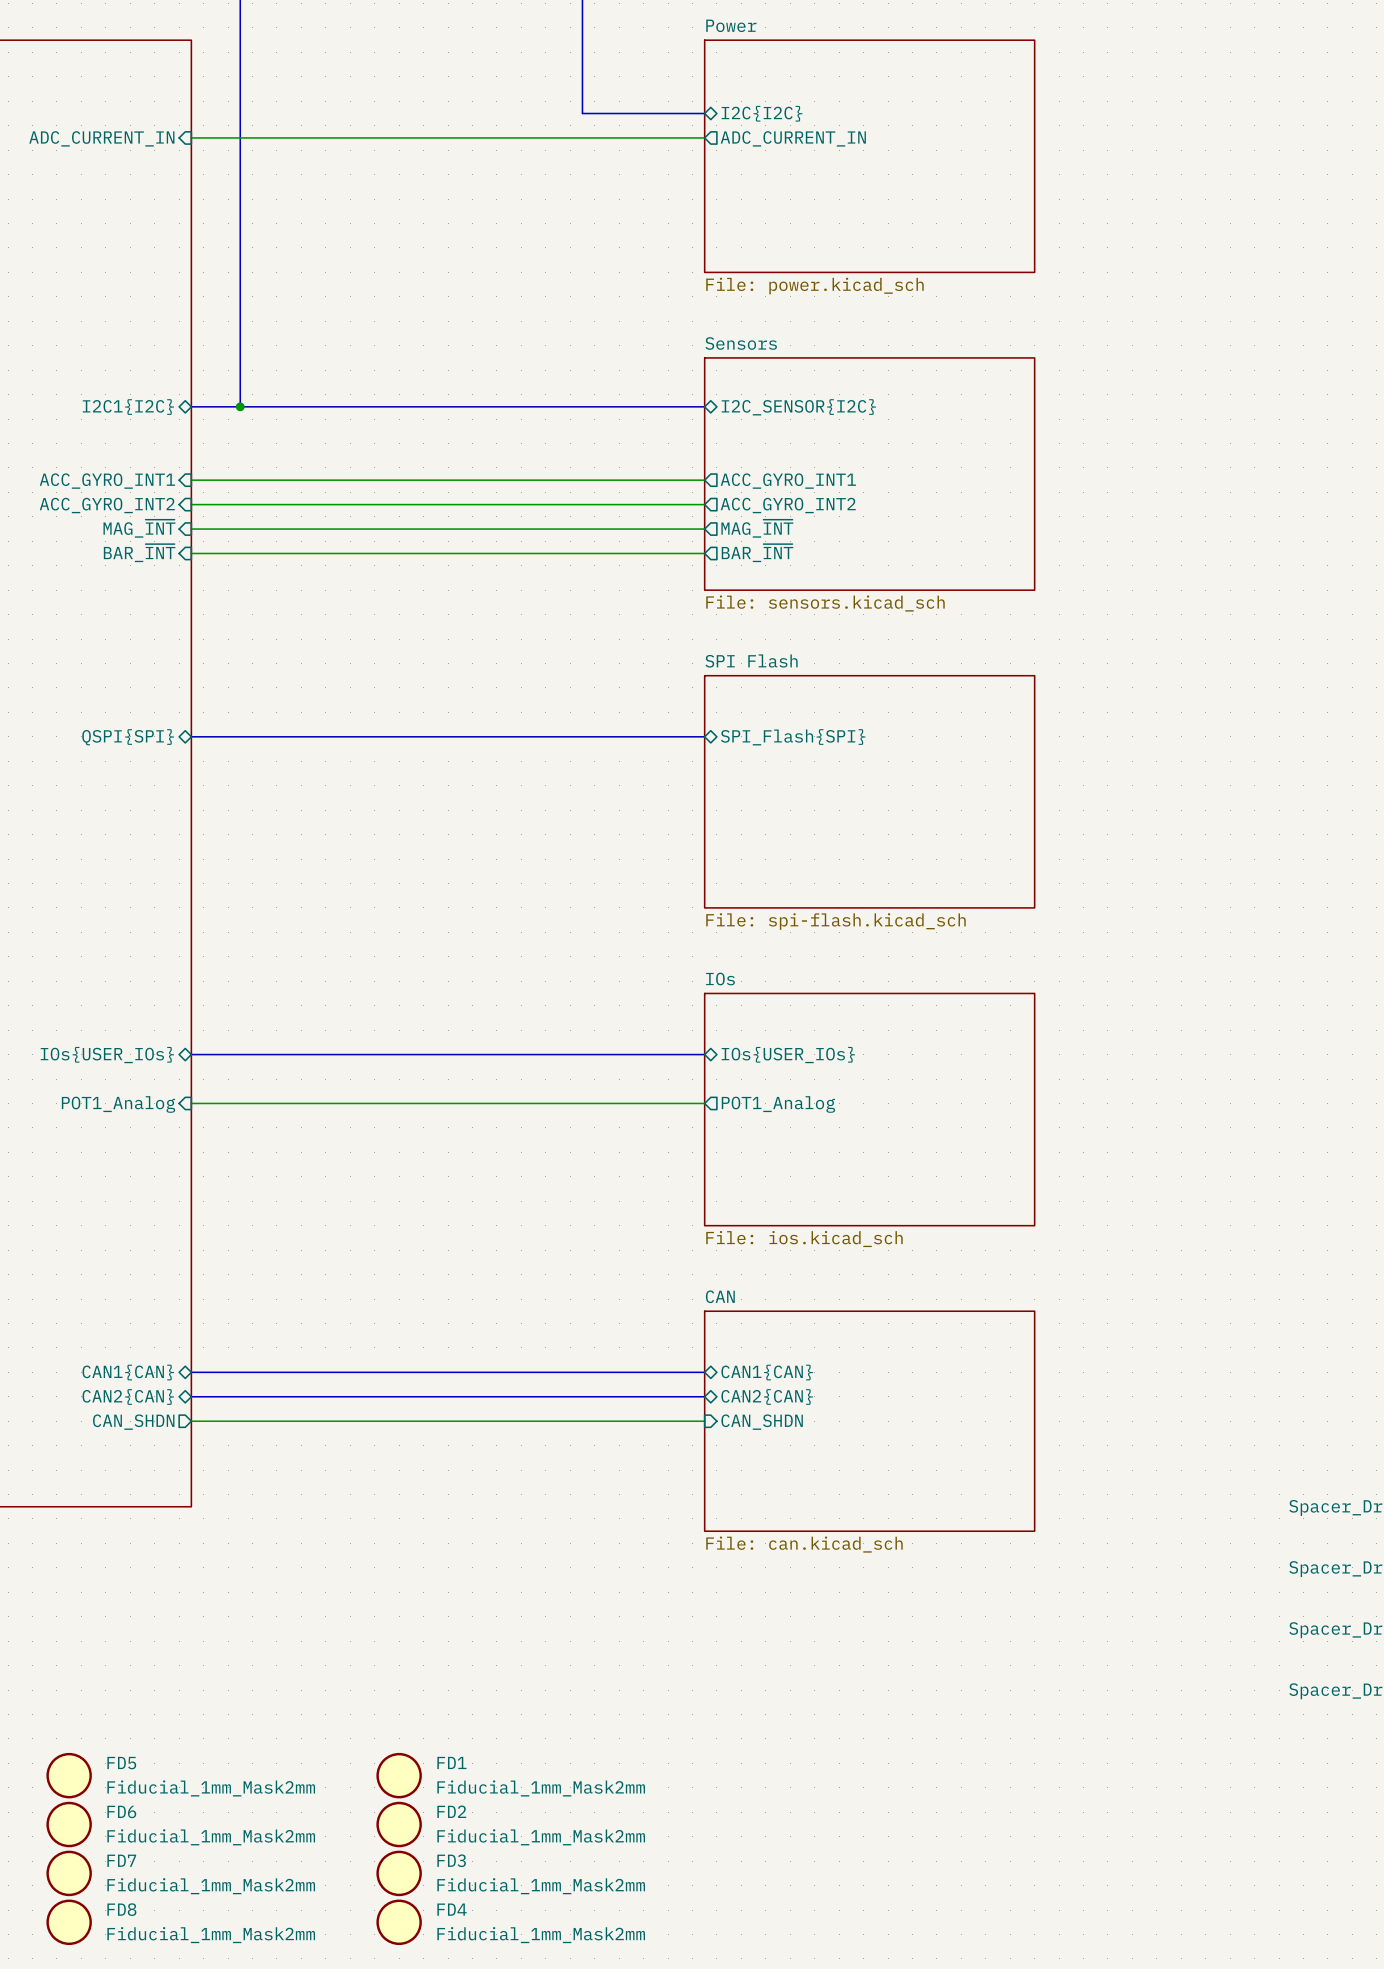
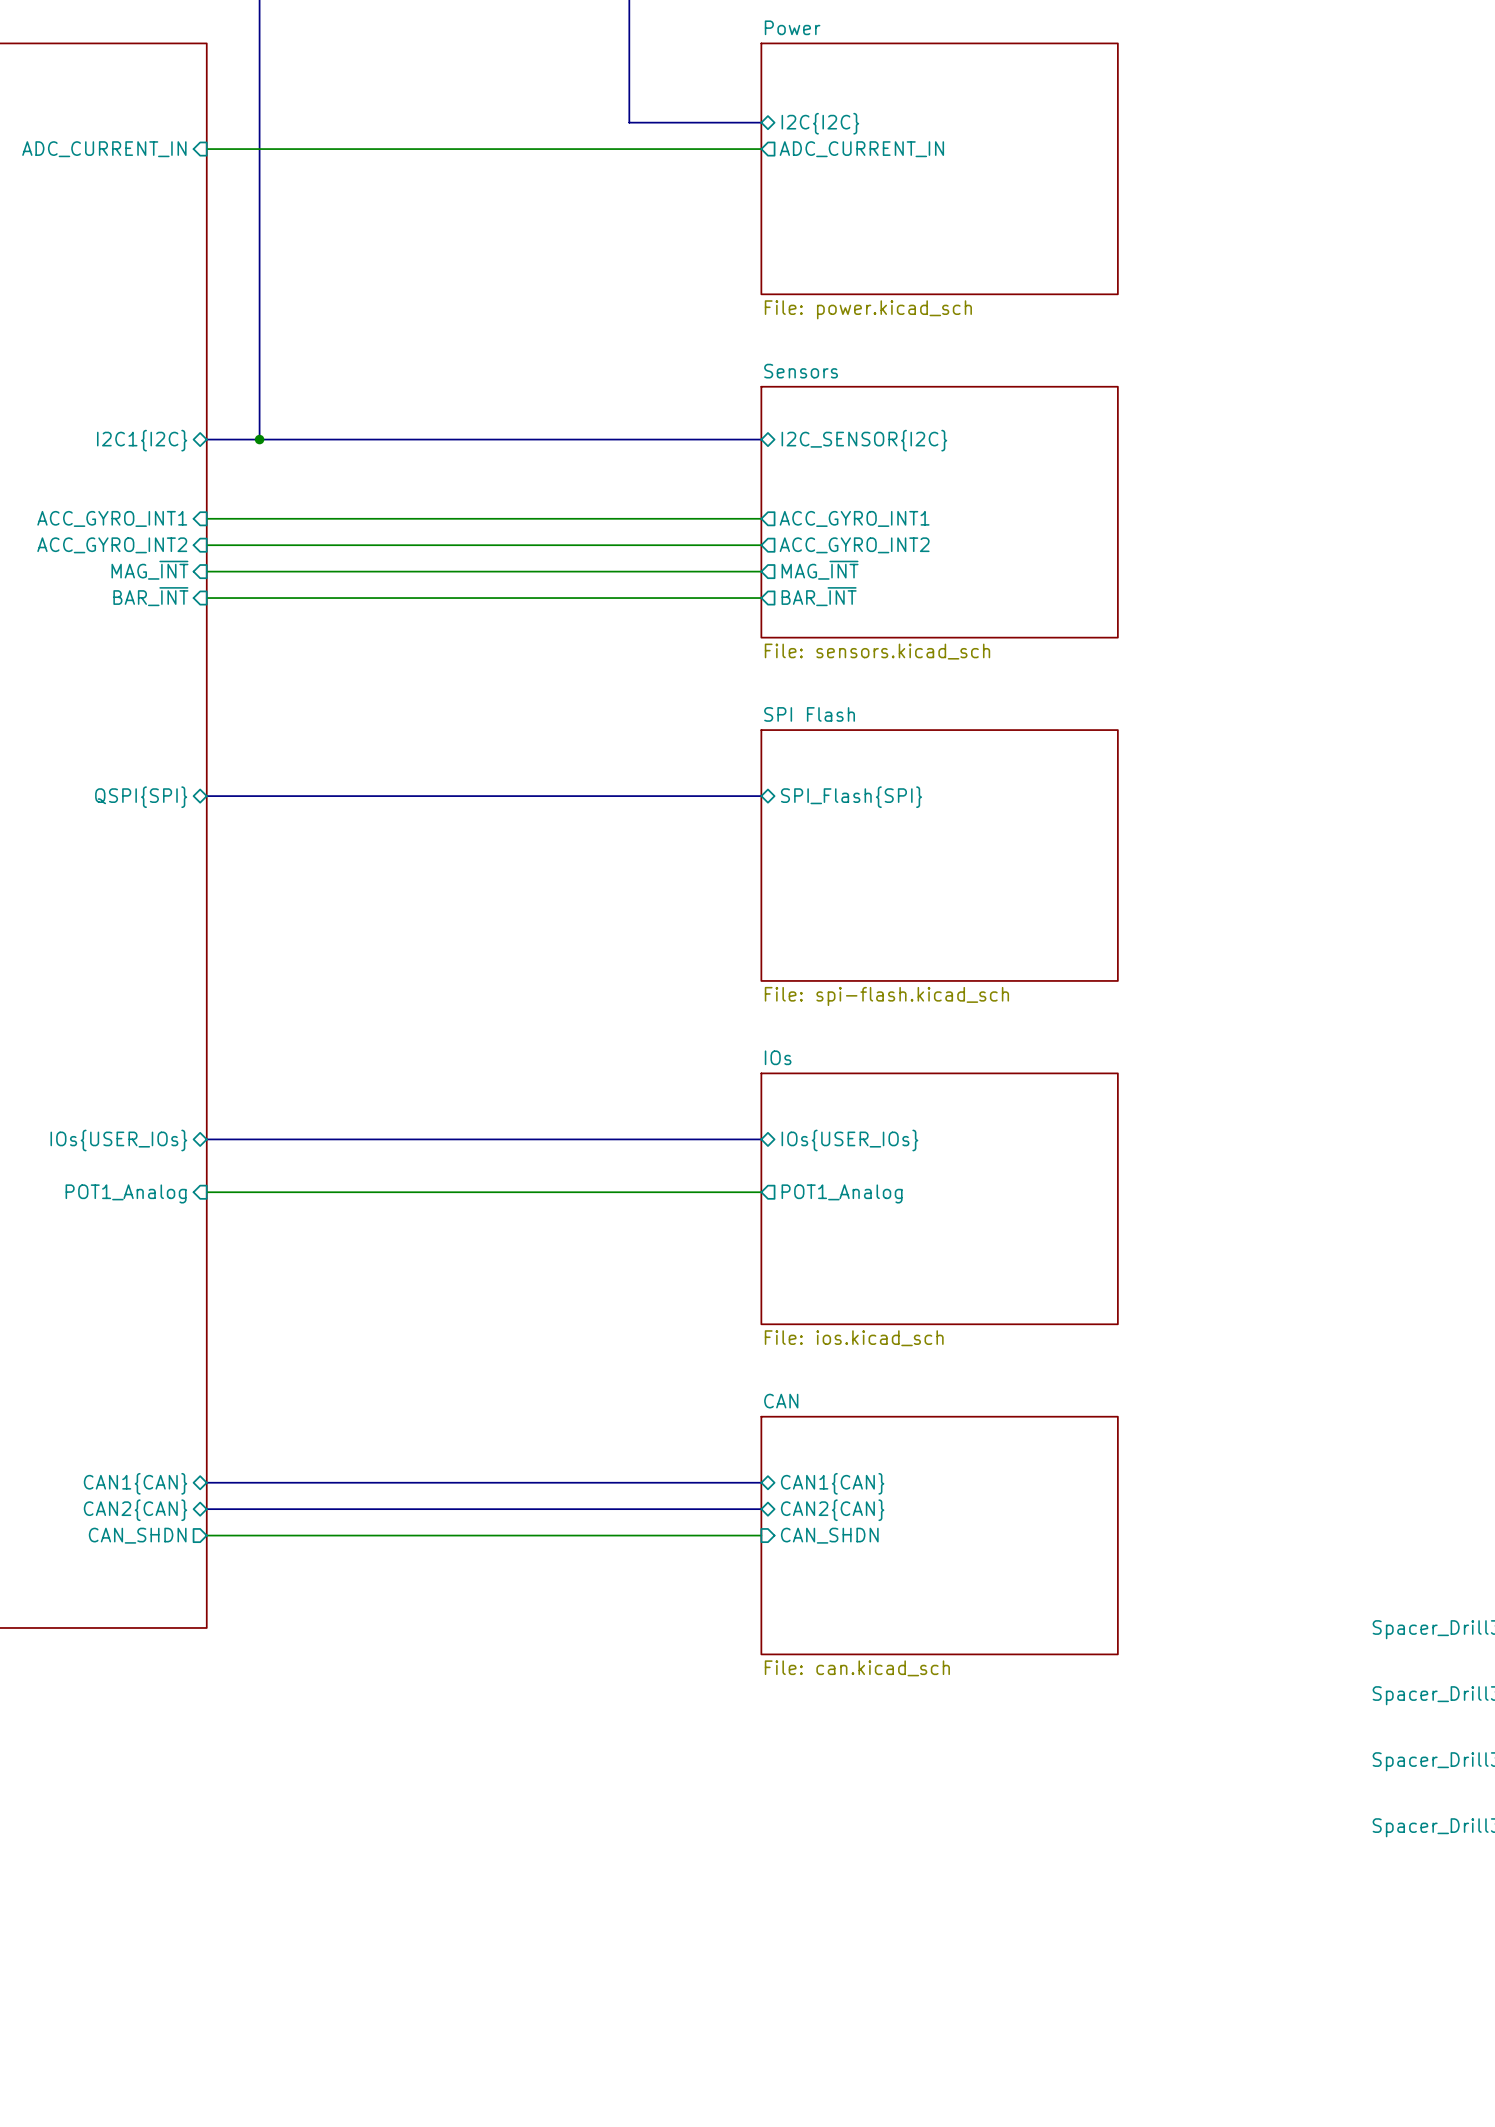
FD5: Fiducial_1mm_Mask2mm (69, 1775) -> none
FD1: Fiducial_1mm_Mask2mm (399, 1775) -> none
FD6: Fiducial_1mm_Mask2mm (69, 1824) -> none
FD2: Fiducial_1mm_Mask2mm (399, 1824) -> none
FD7: Fiducial_1mm_Mask2mm (69, 1873) -> none
FD3: Fiducial_1mm_Mask2mm (399, 1873) -> none
FD8: Fiducial_1mm_Mask2mm (69, 1922) -> none
FD4: Fiducial_1mm_Mask2mm (399, 1922) -> none

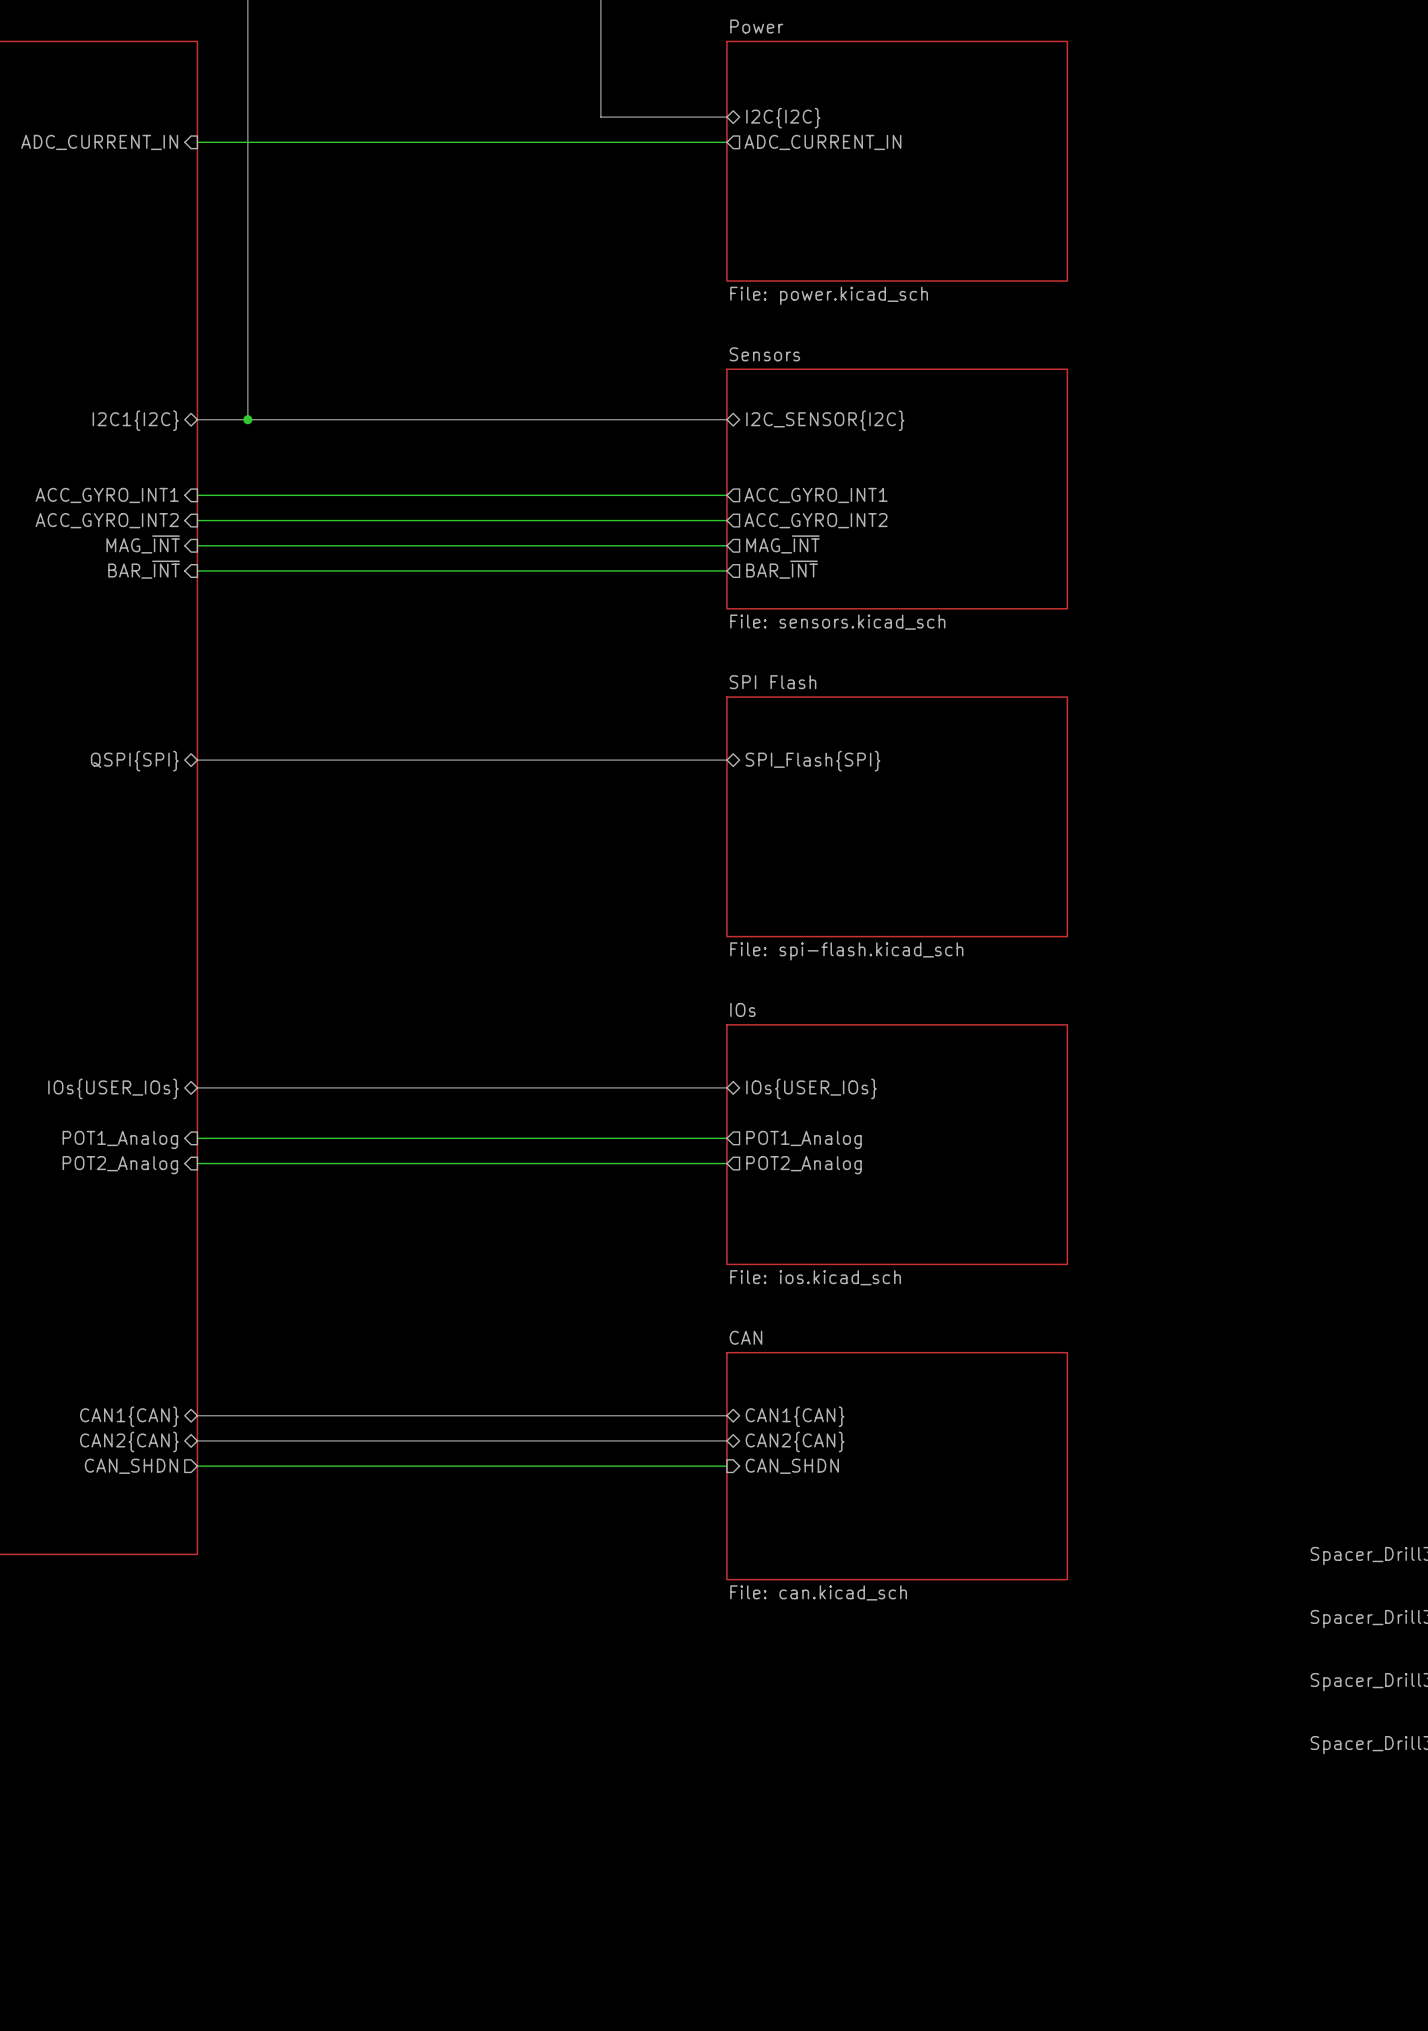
wire: none -> (197, 1163) (726, 1163)
sheet pin: none -> POT2_Analog (120, 1165)
sheet pin: none -> POT2_Analog (803, 1165)

